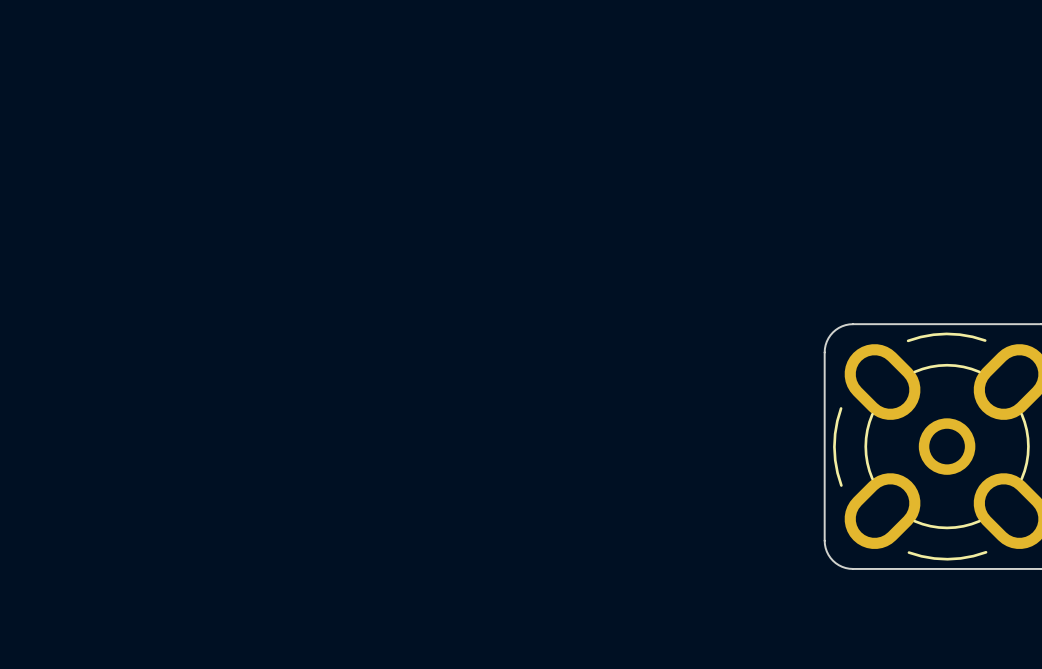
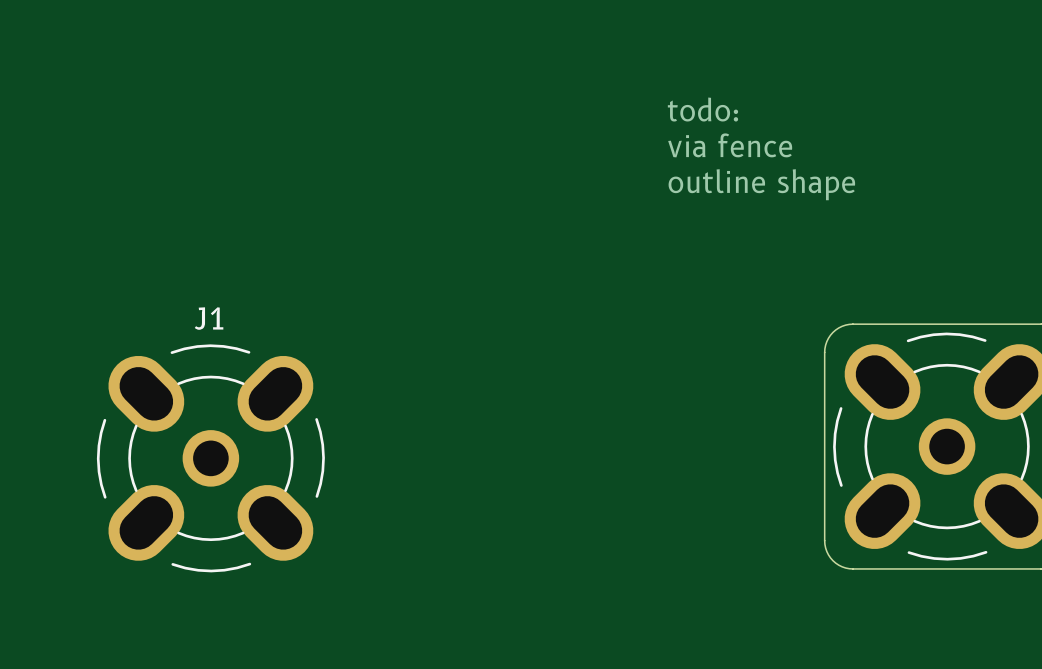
text: none -> todo: (702, 109)
text: none -> via fence (730, 145)
text: none -> outline shape (761, 184)
J1: none -> (210, 458)

